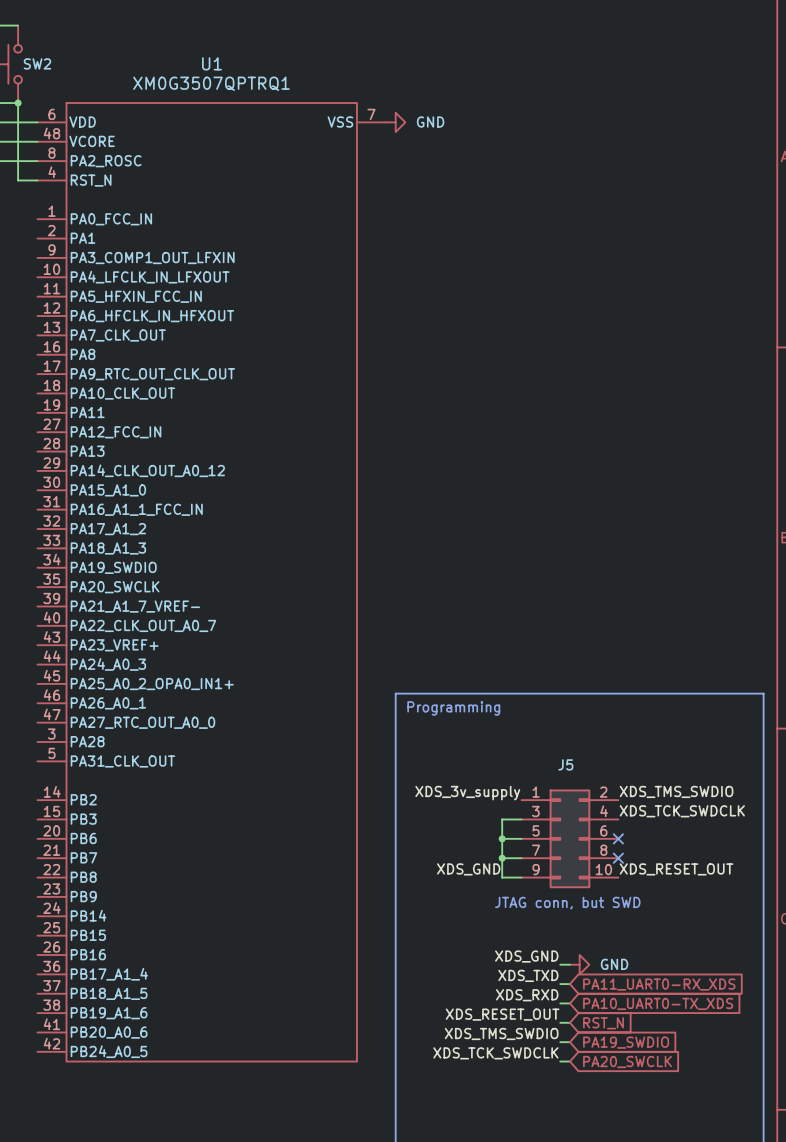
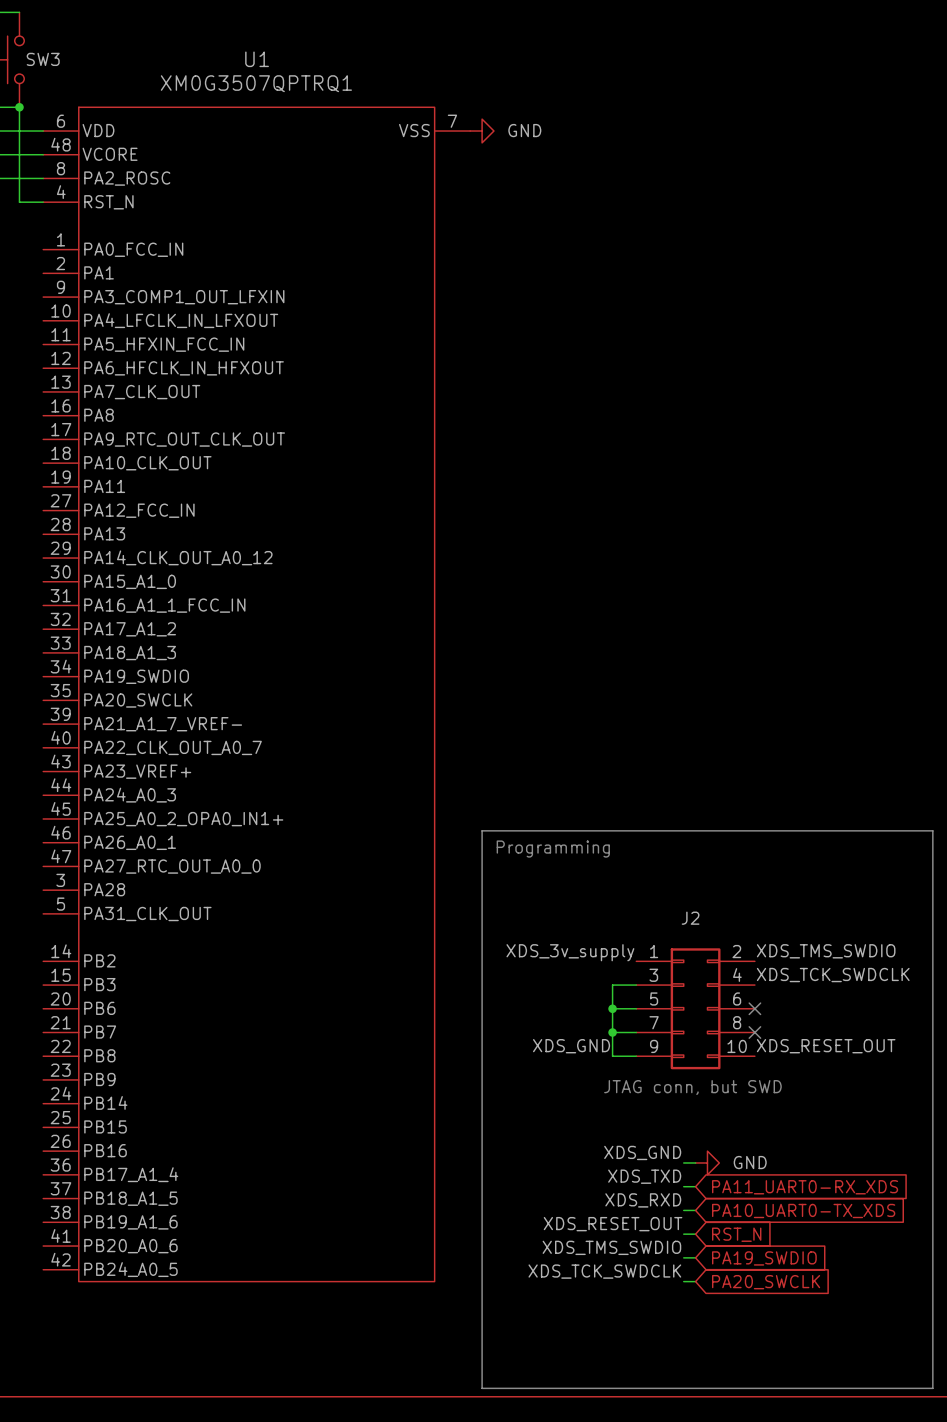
SW2 name: SW2 (37, 63) -> SW3 (43, 59)
J5 name: J5 (565, 764) -> J2 (690, 918)

